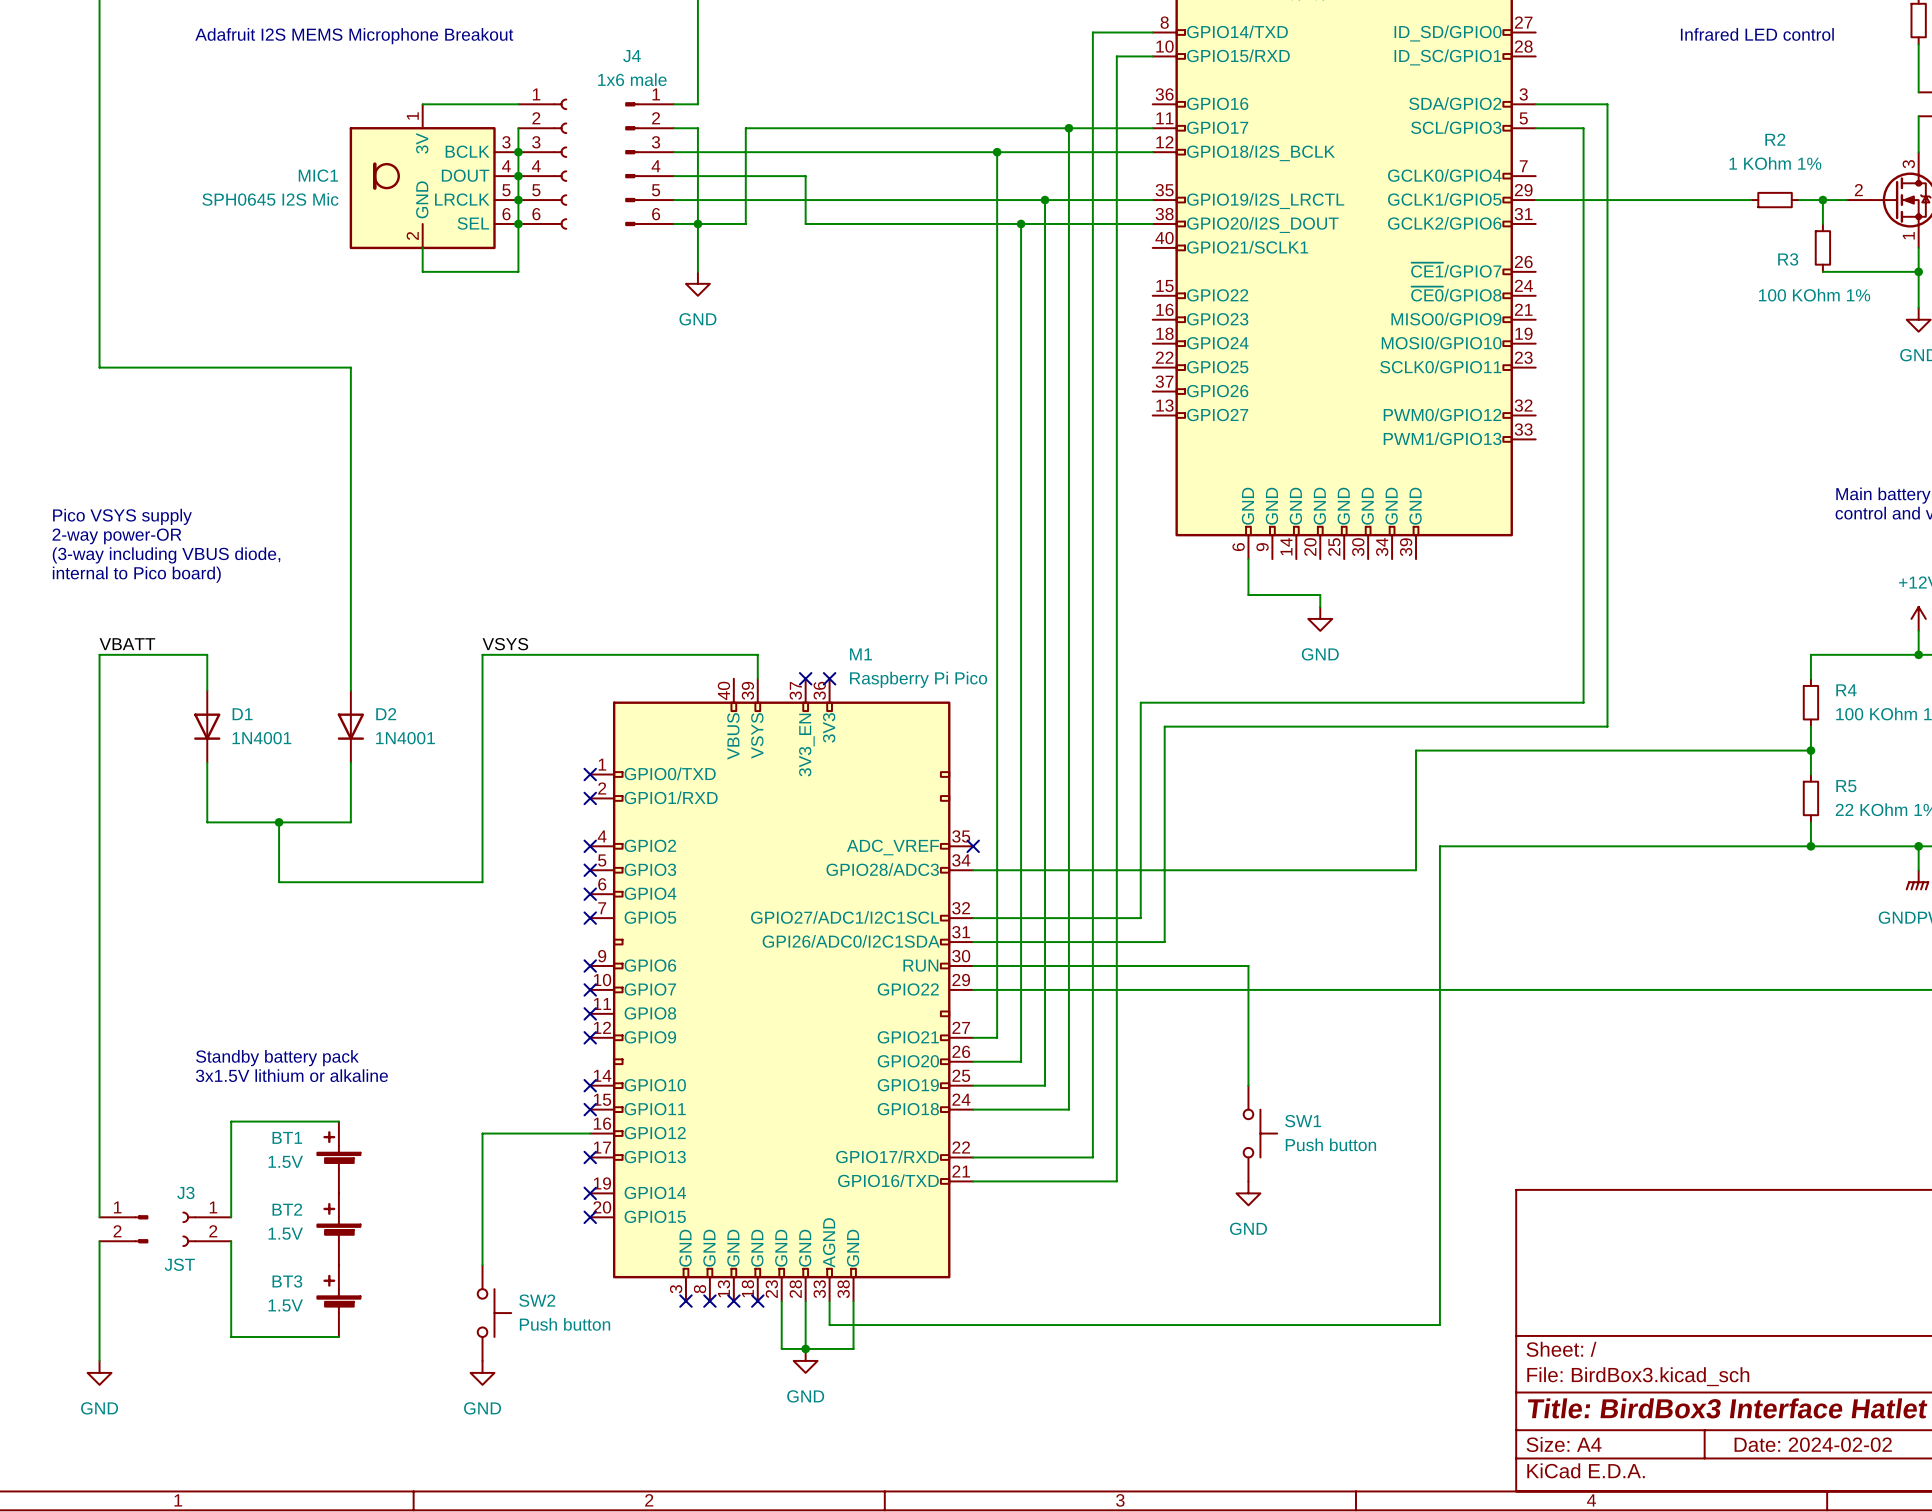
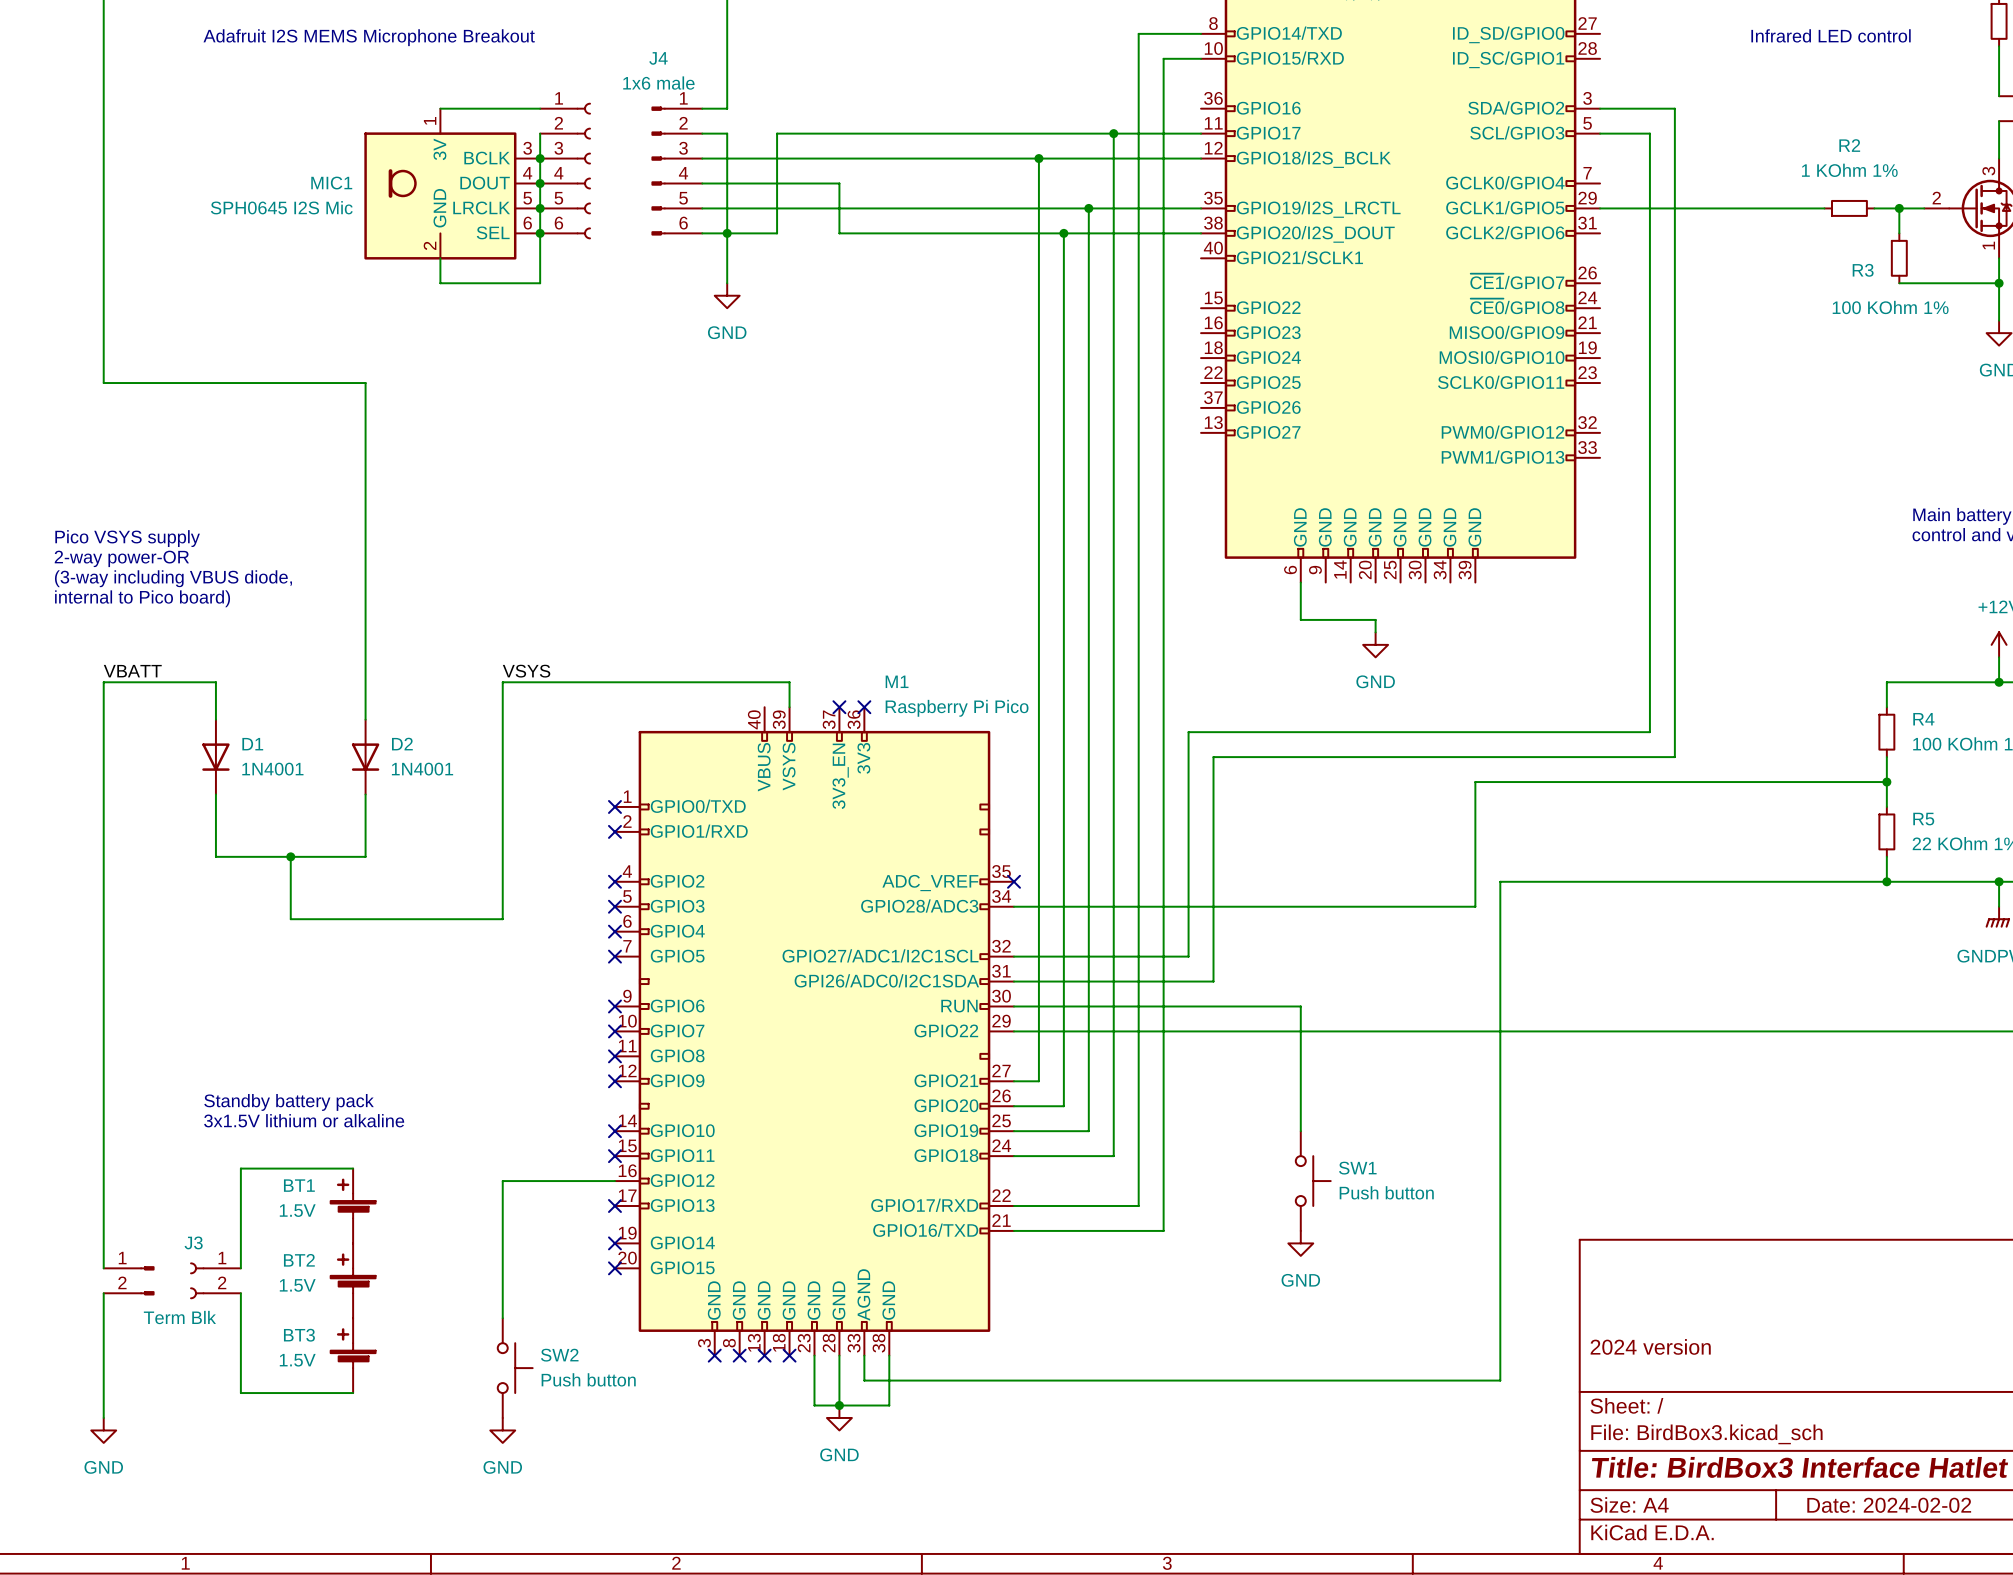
J3 value: JST (179, 1264) -> Term Blk (179, 1317)
title block: none -> 2024 version (1650, 1346)

